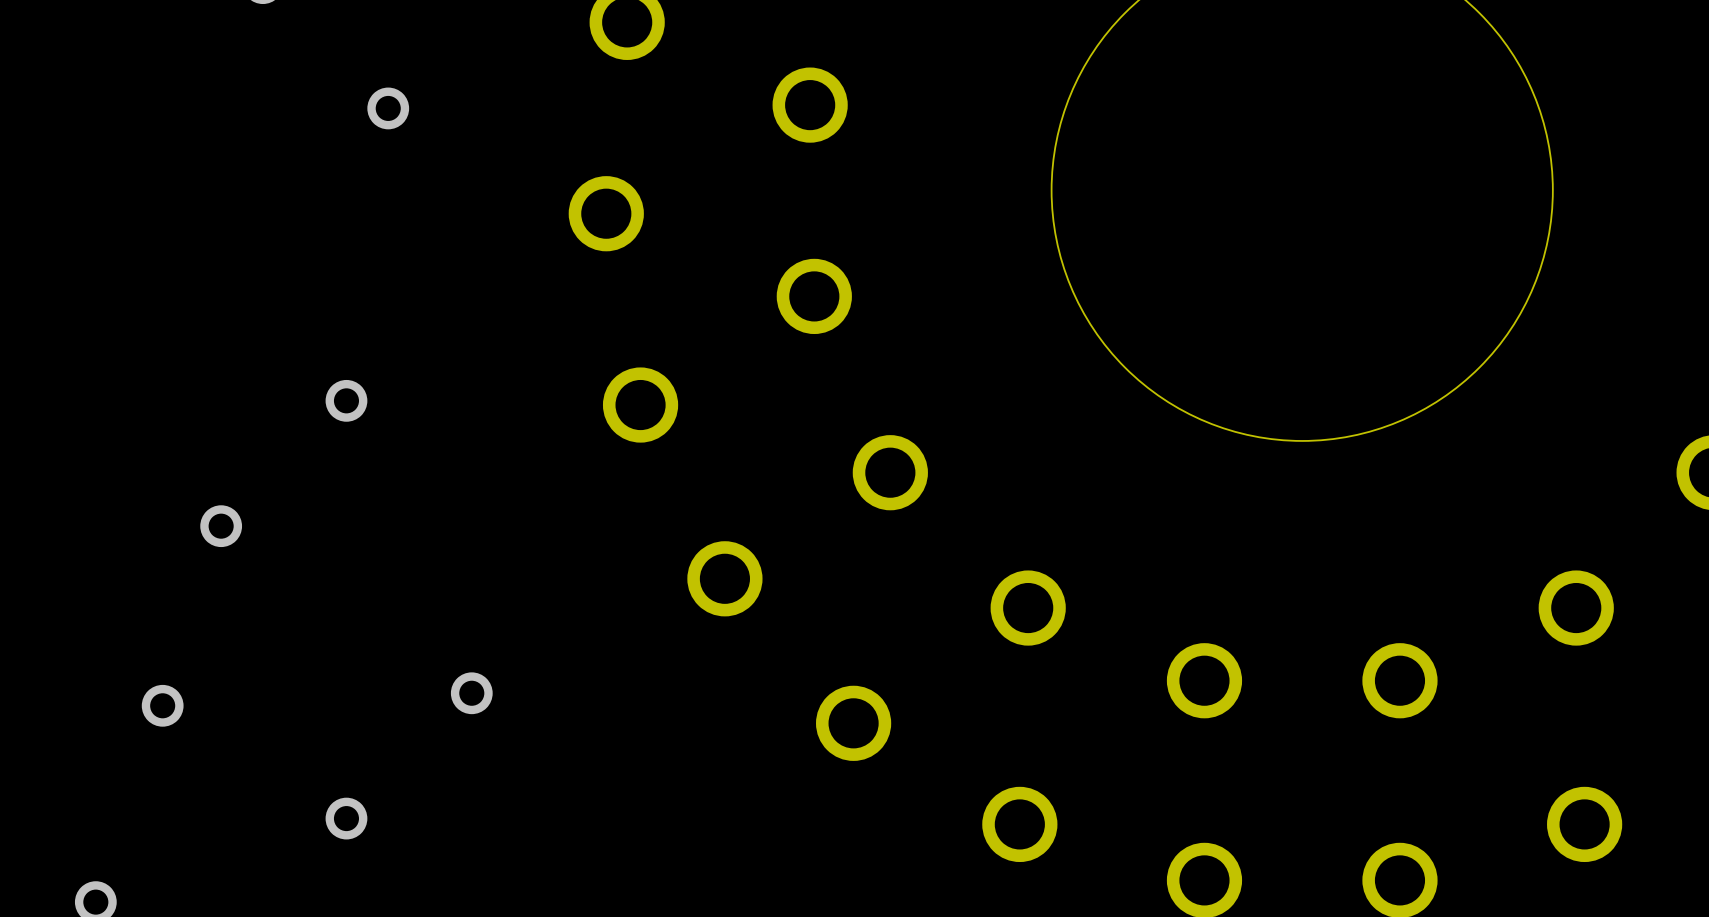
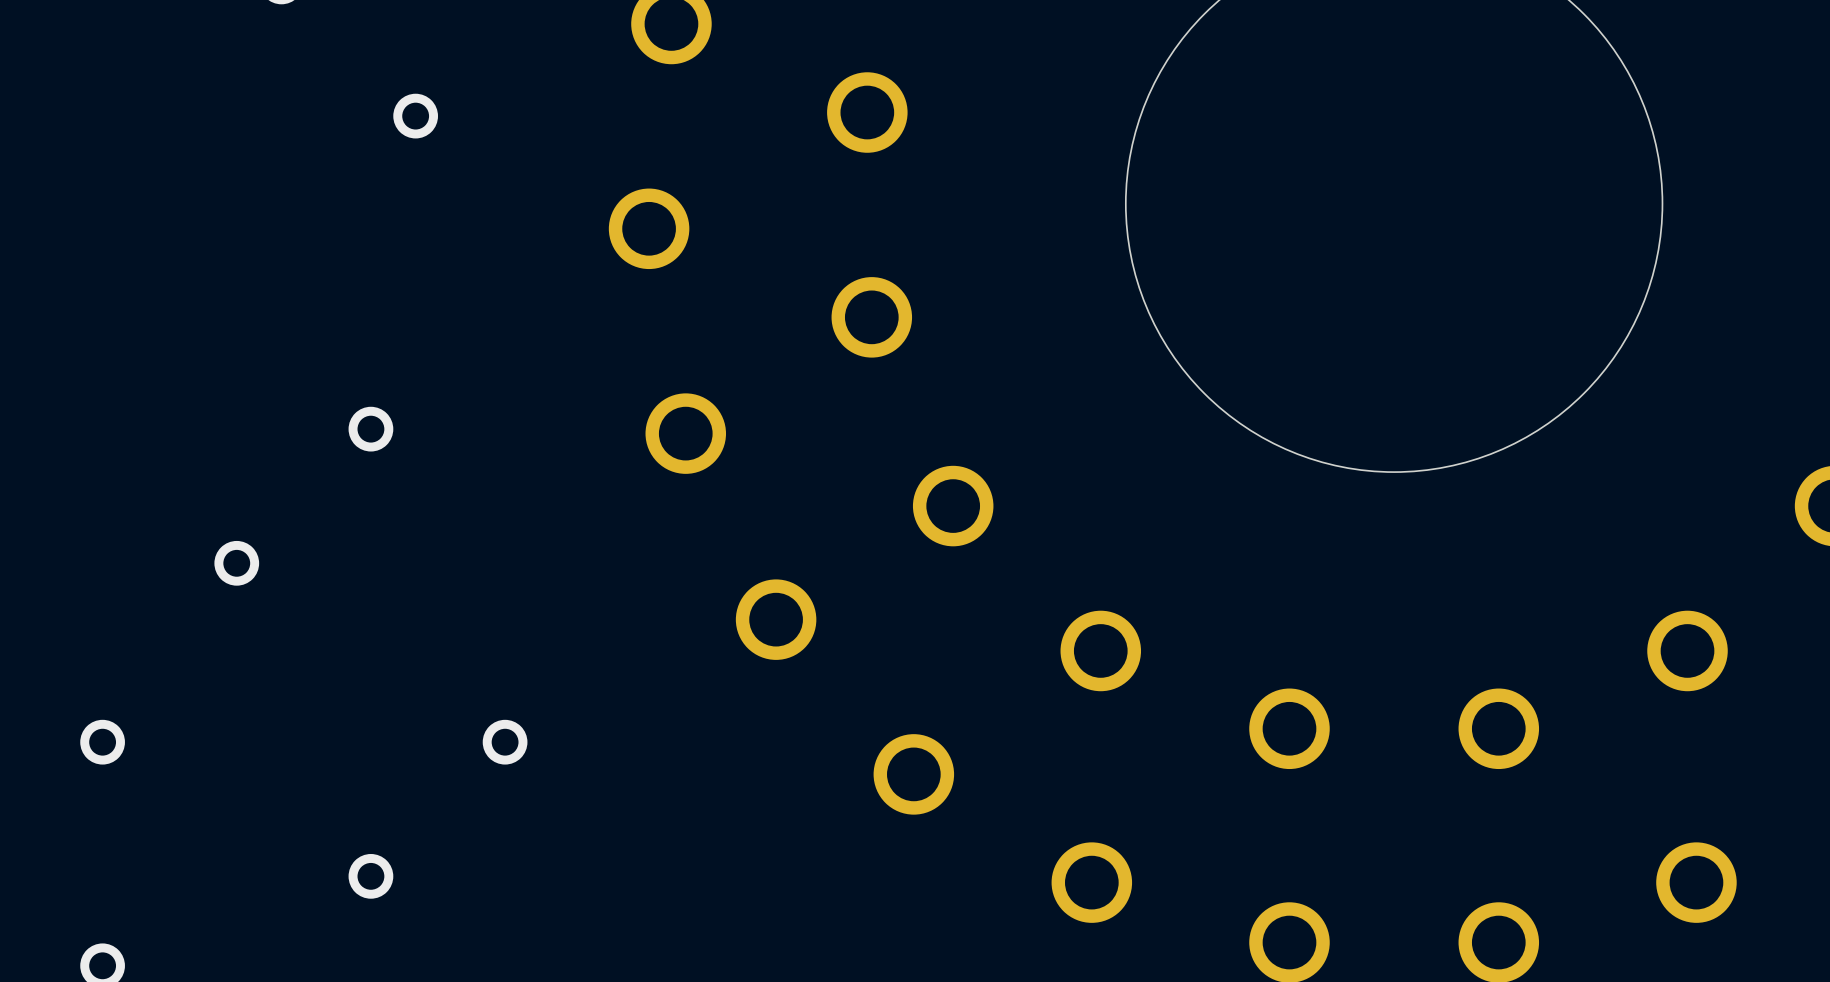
via position: (162, 705) -> (102, 742)

